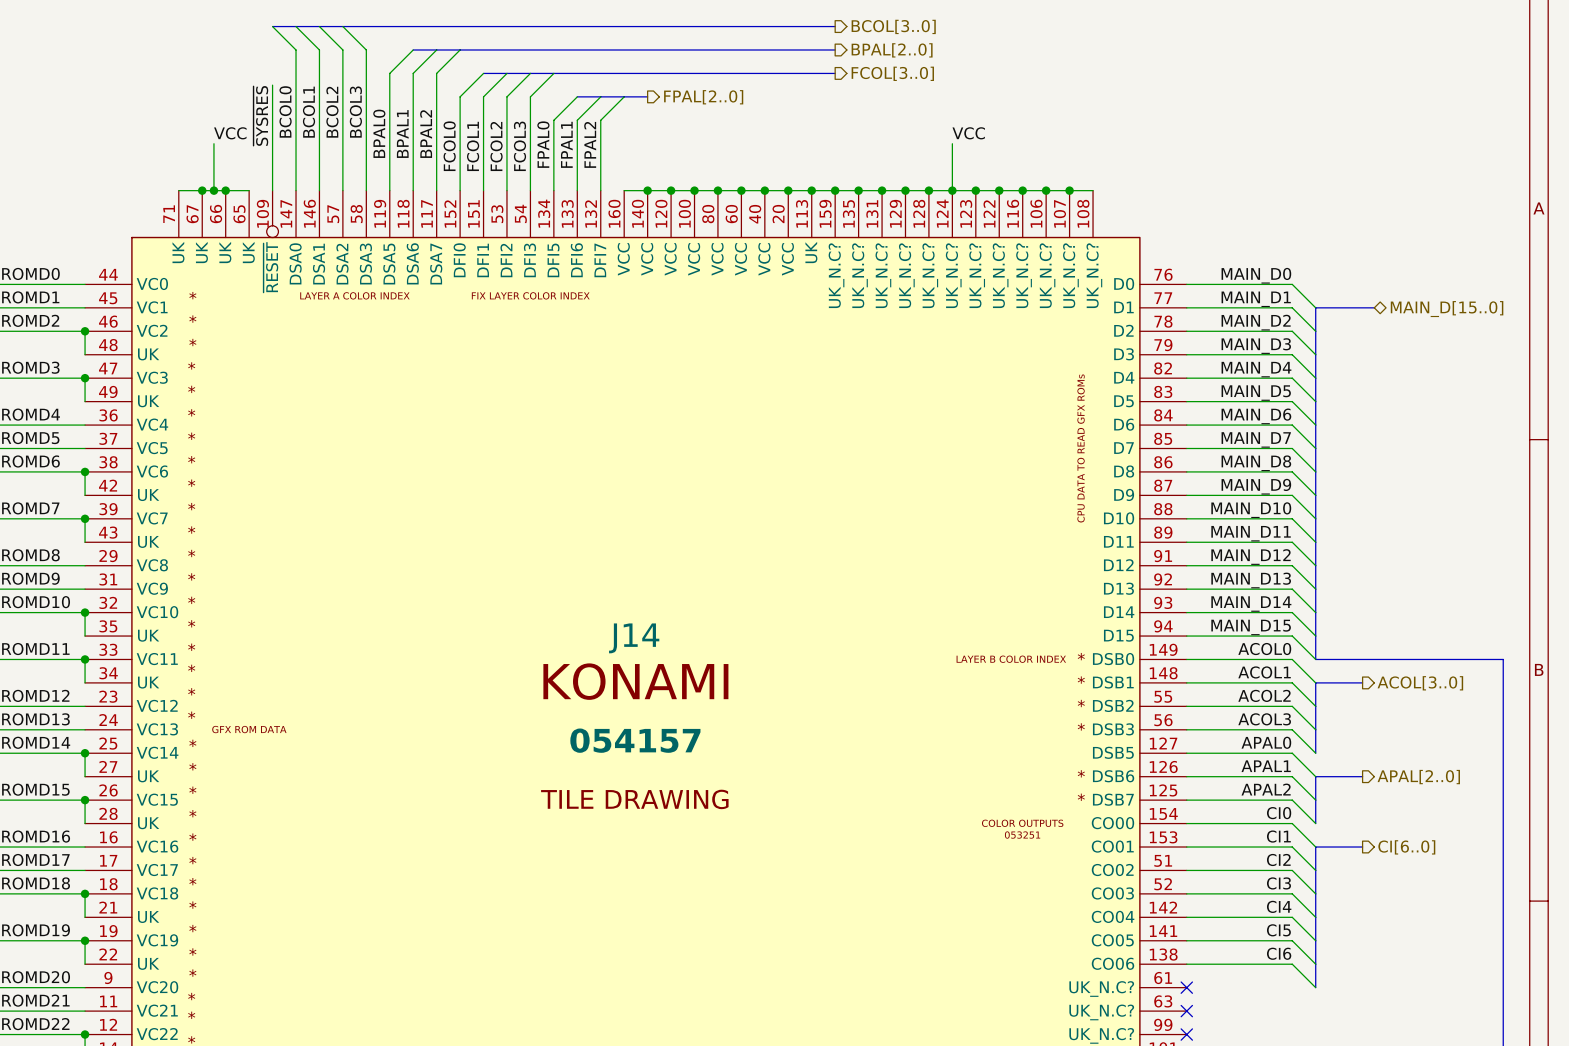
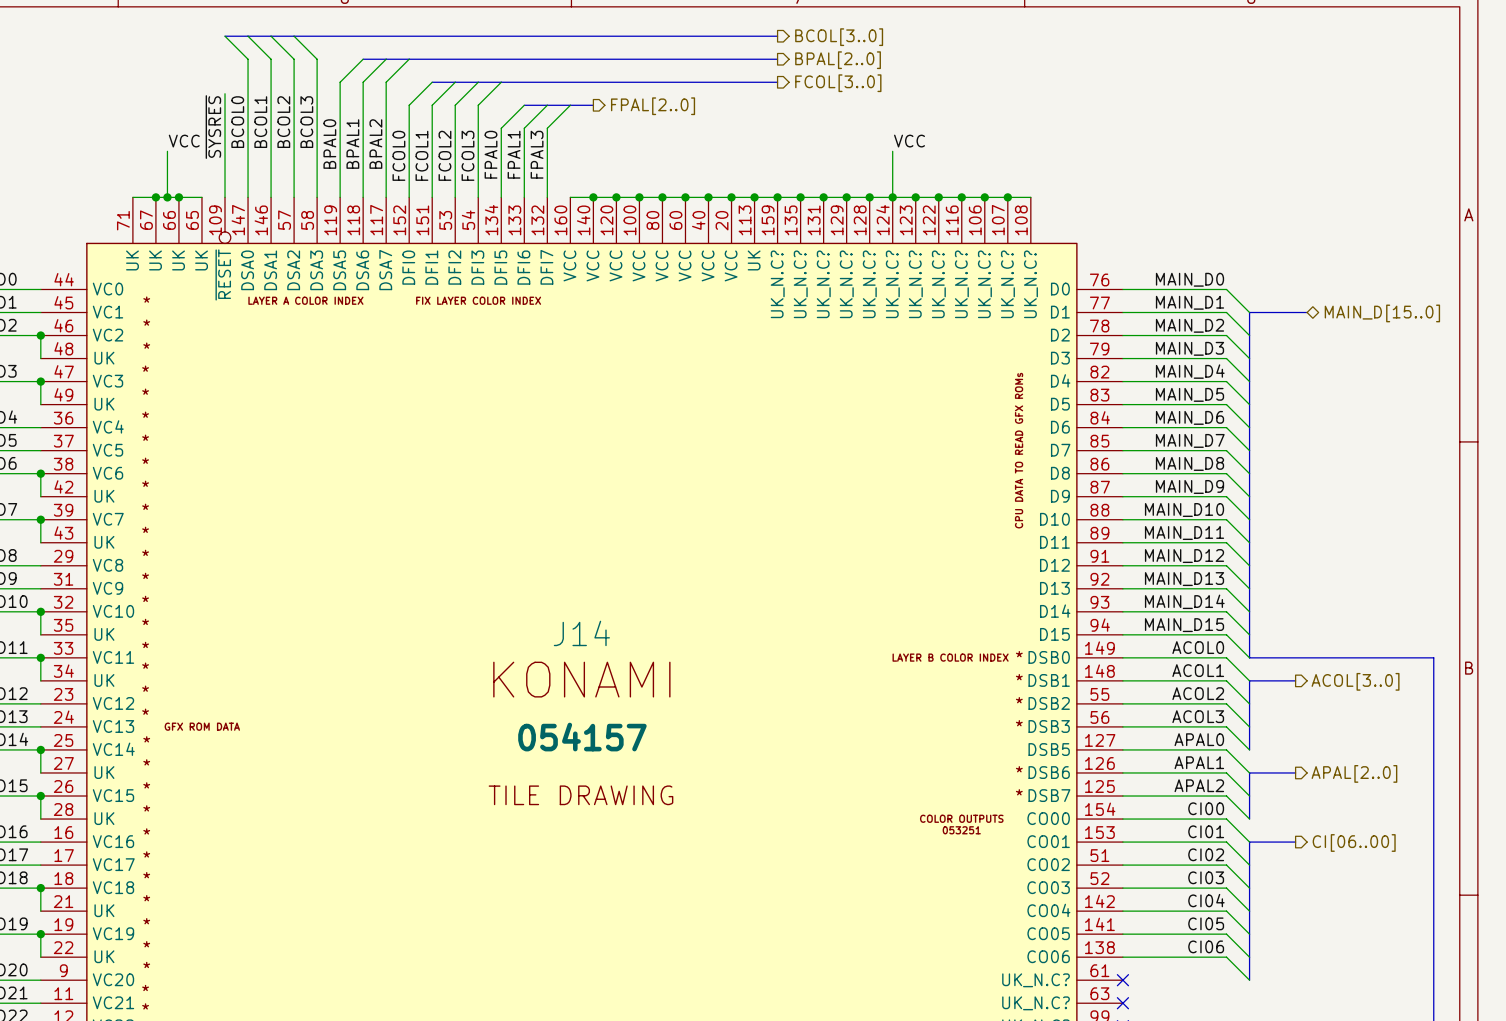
label: FPAL2 (590, 144) -> FPAL3 (537, 154)
label: CI0 (1279, 813) -> CI00 (1206, 808)
label: CI1 (1278, 836) -> CI01 (1206, 831)
hierarchical label: CI[6..0] (1406, 847) -> CI[06..00] (1354, 842)
label: CI2 (1278, 859) -> CI02 (1206, 854)
label: CI3 (1278, 883) -> CI03 (1206, 877)
label: CI4 (1279, 906) -> CI04 (1206, 900)
label: CI5 (1278, 930) -> CI05 (1206, 923)
label: CI6 (1279, 953) -> CI06 (1206, 946)

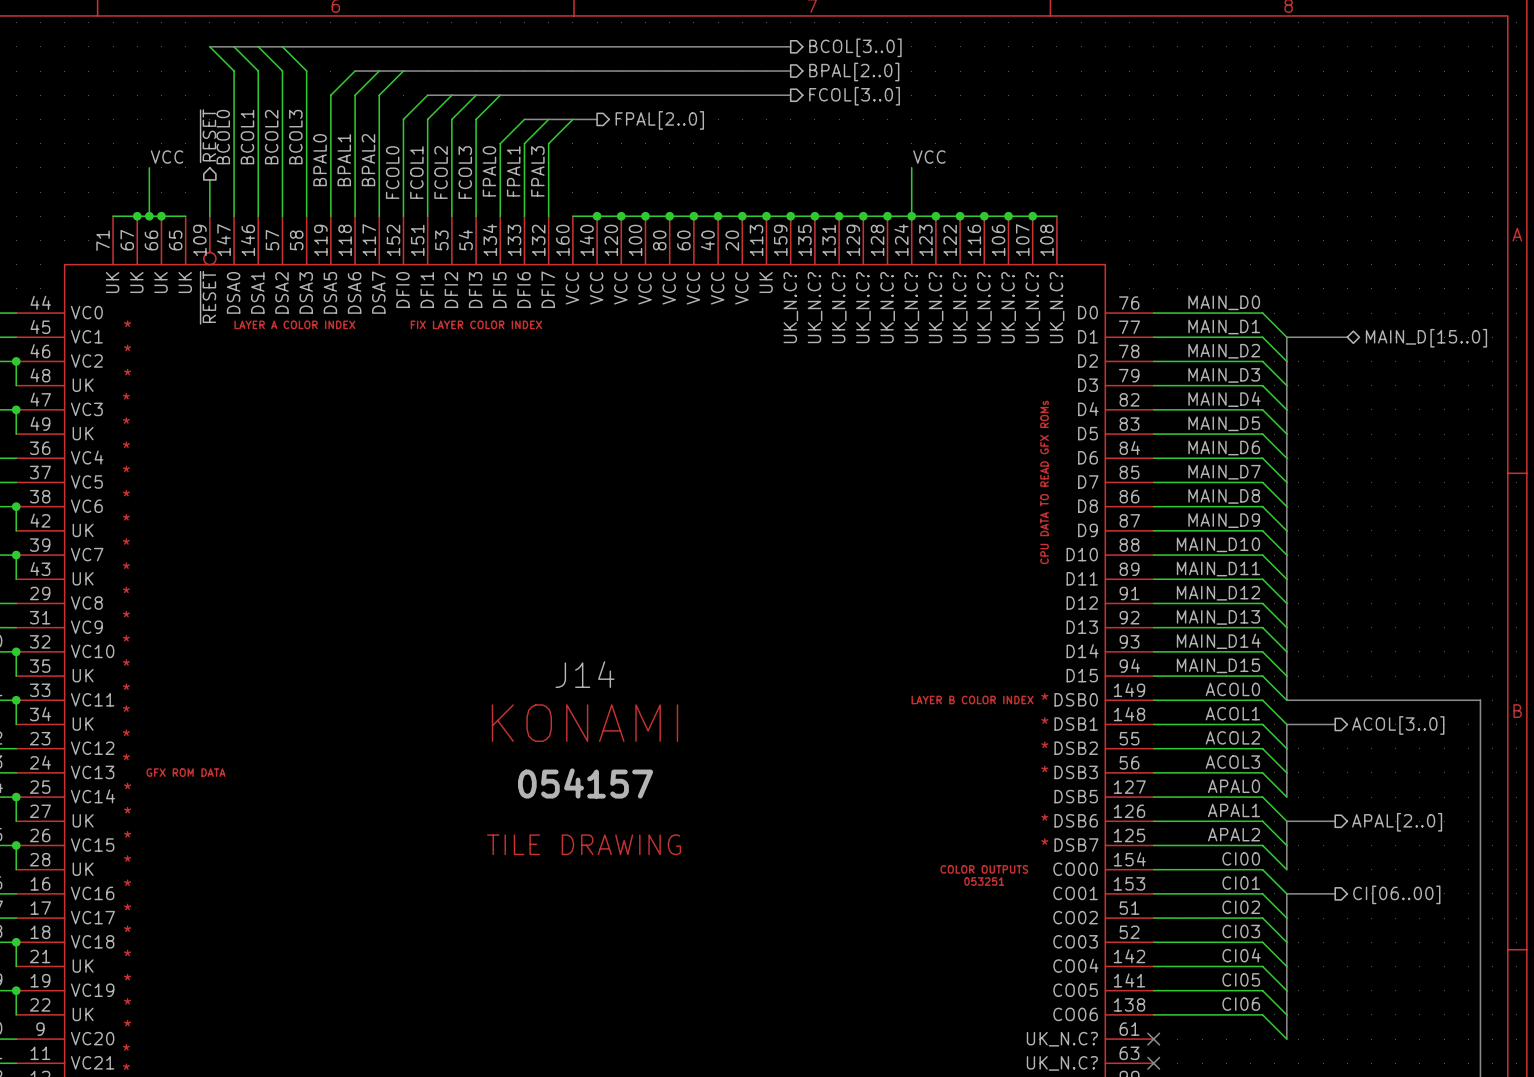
wire: (225, 93) (225, 162) -> none
hierarchical label: none -> ~{RESET} (208, 136)
label: ~{SYSRES} (213, 127) -> none

